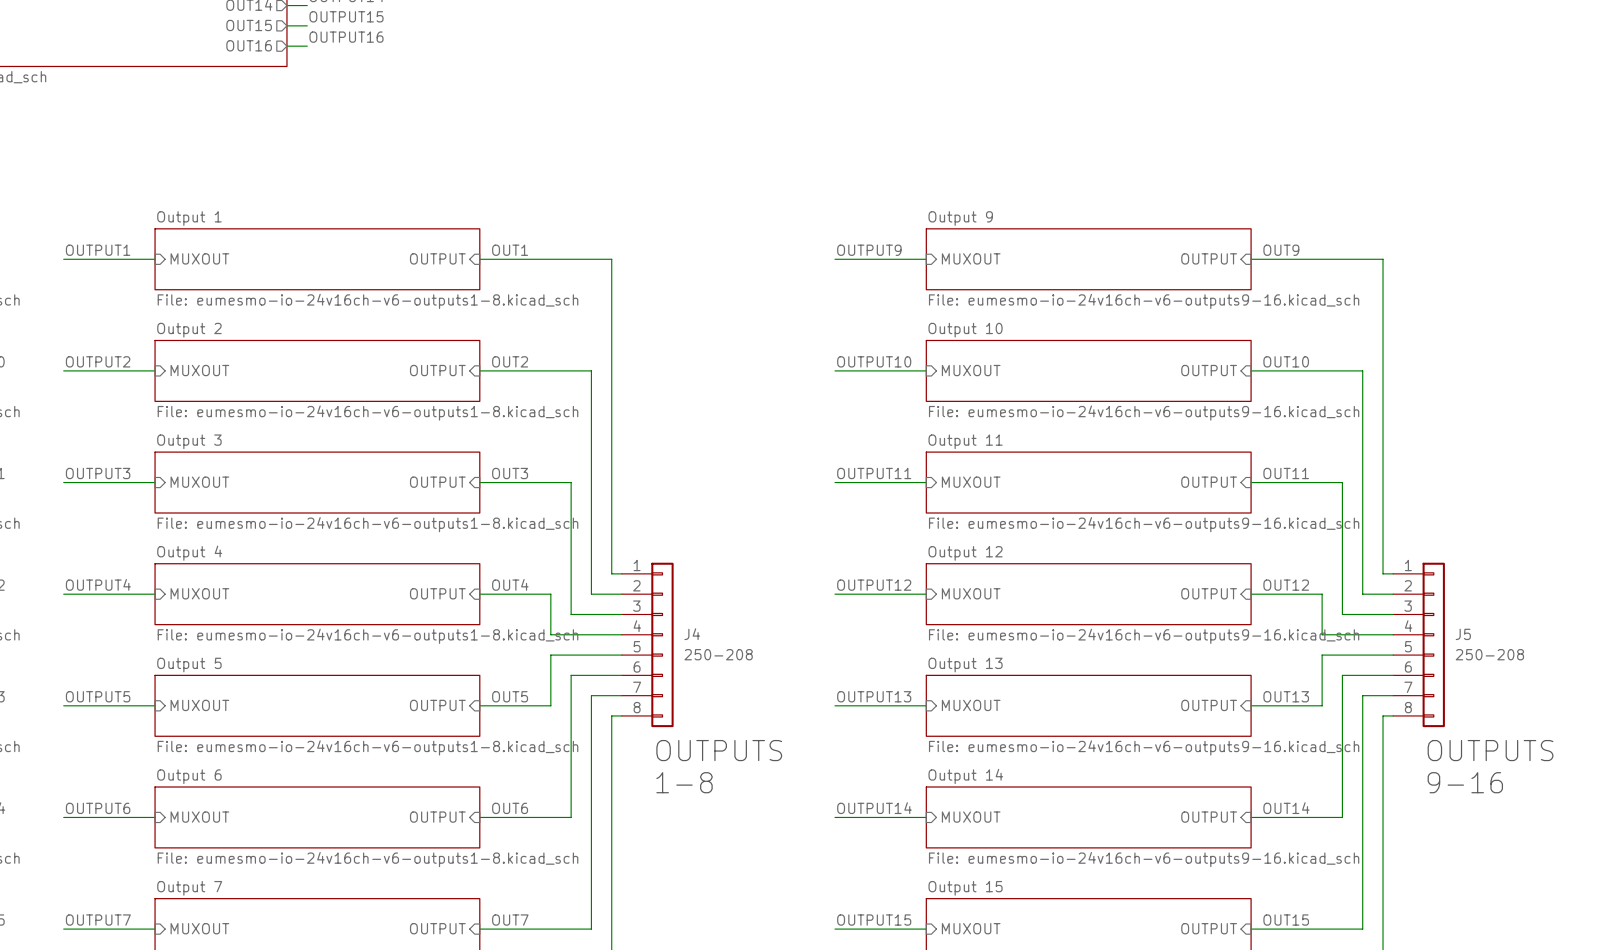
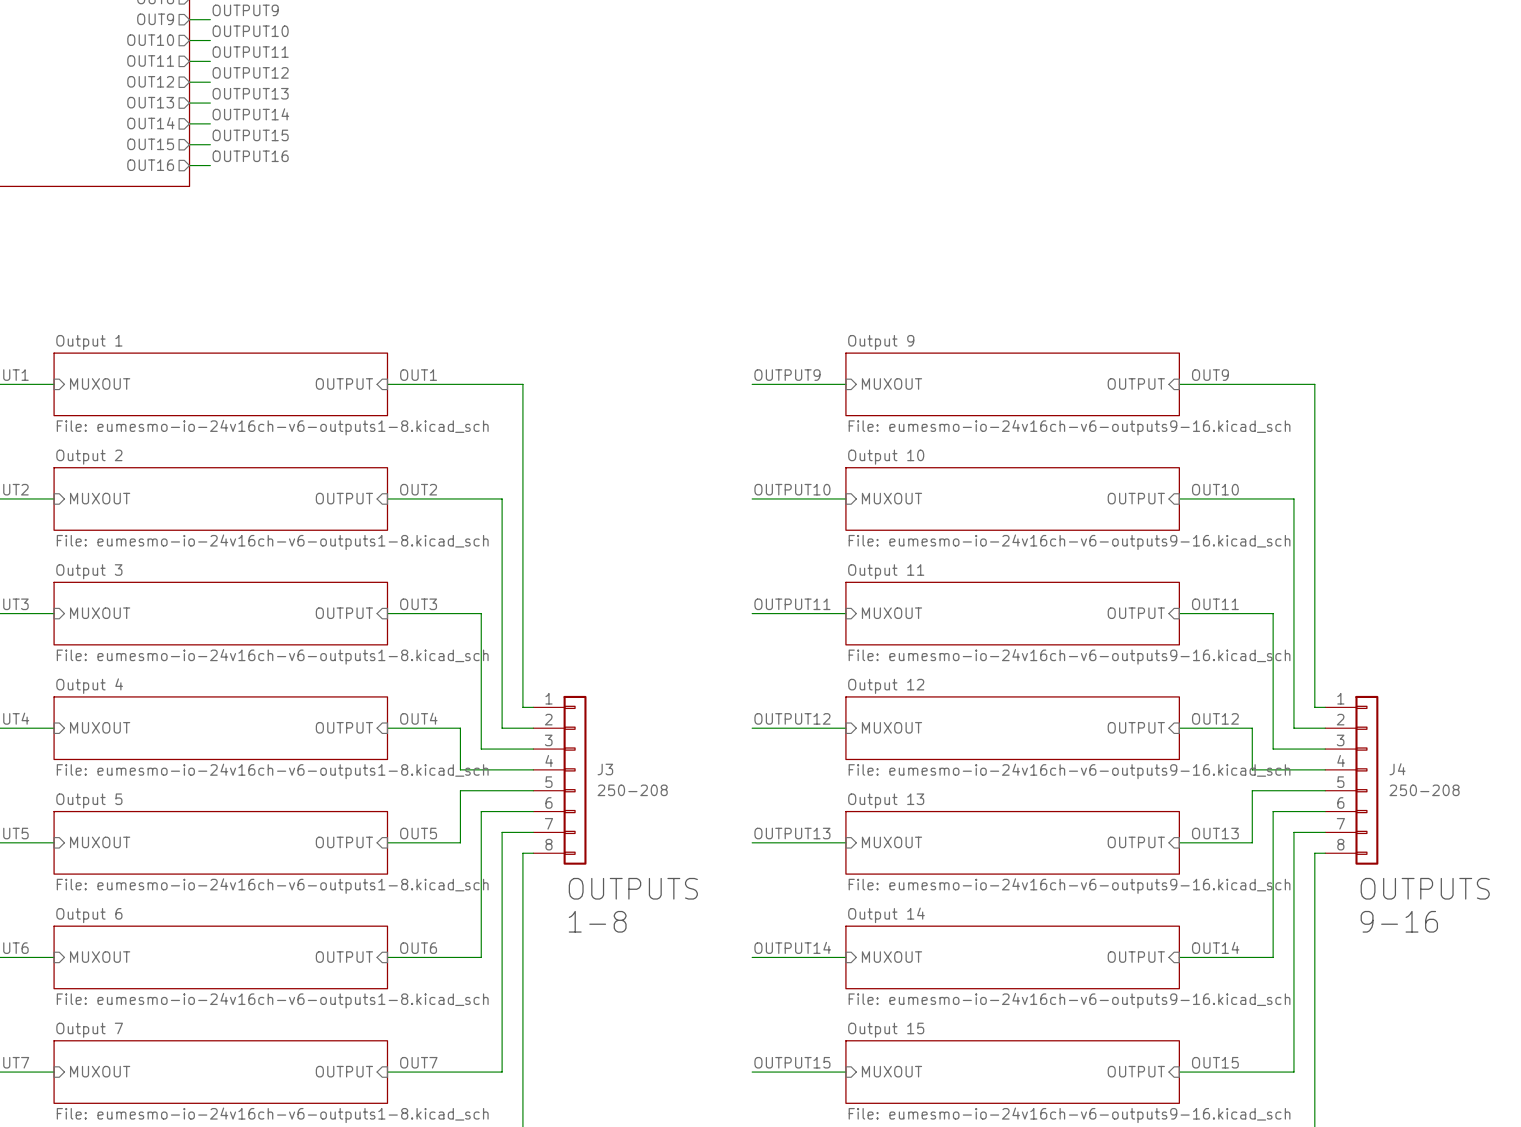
J4 name: J4 (692, 634) -> J3 (605, 769)
J5 name: J5 (1463, 634) -> J4 (1397, 769)

